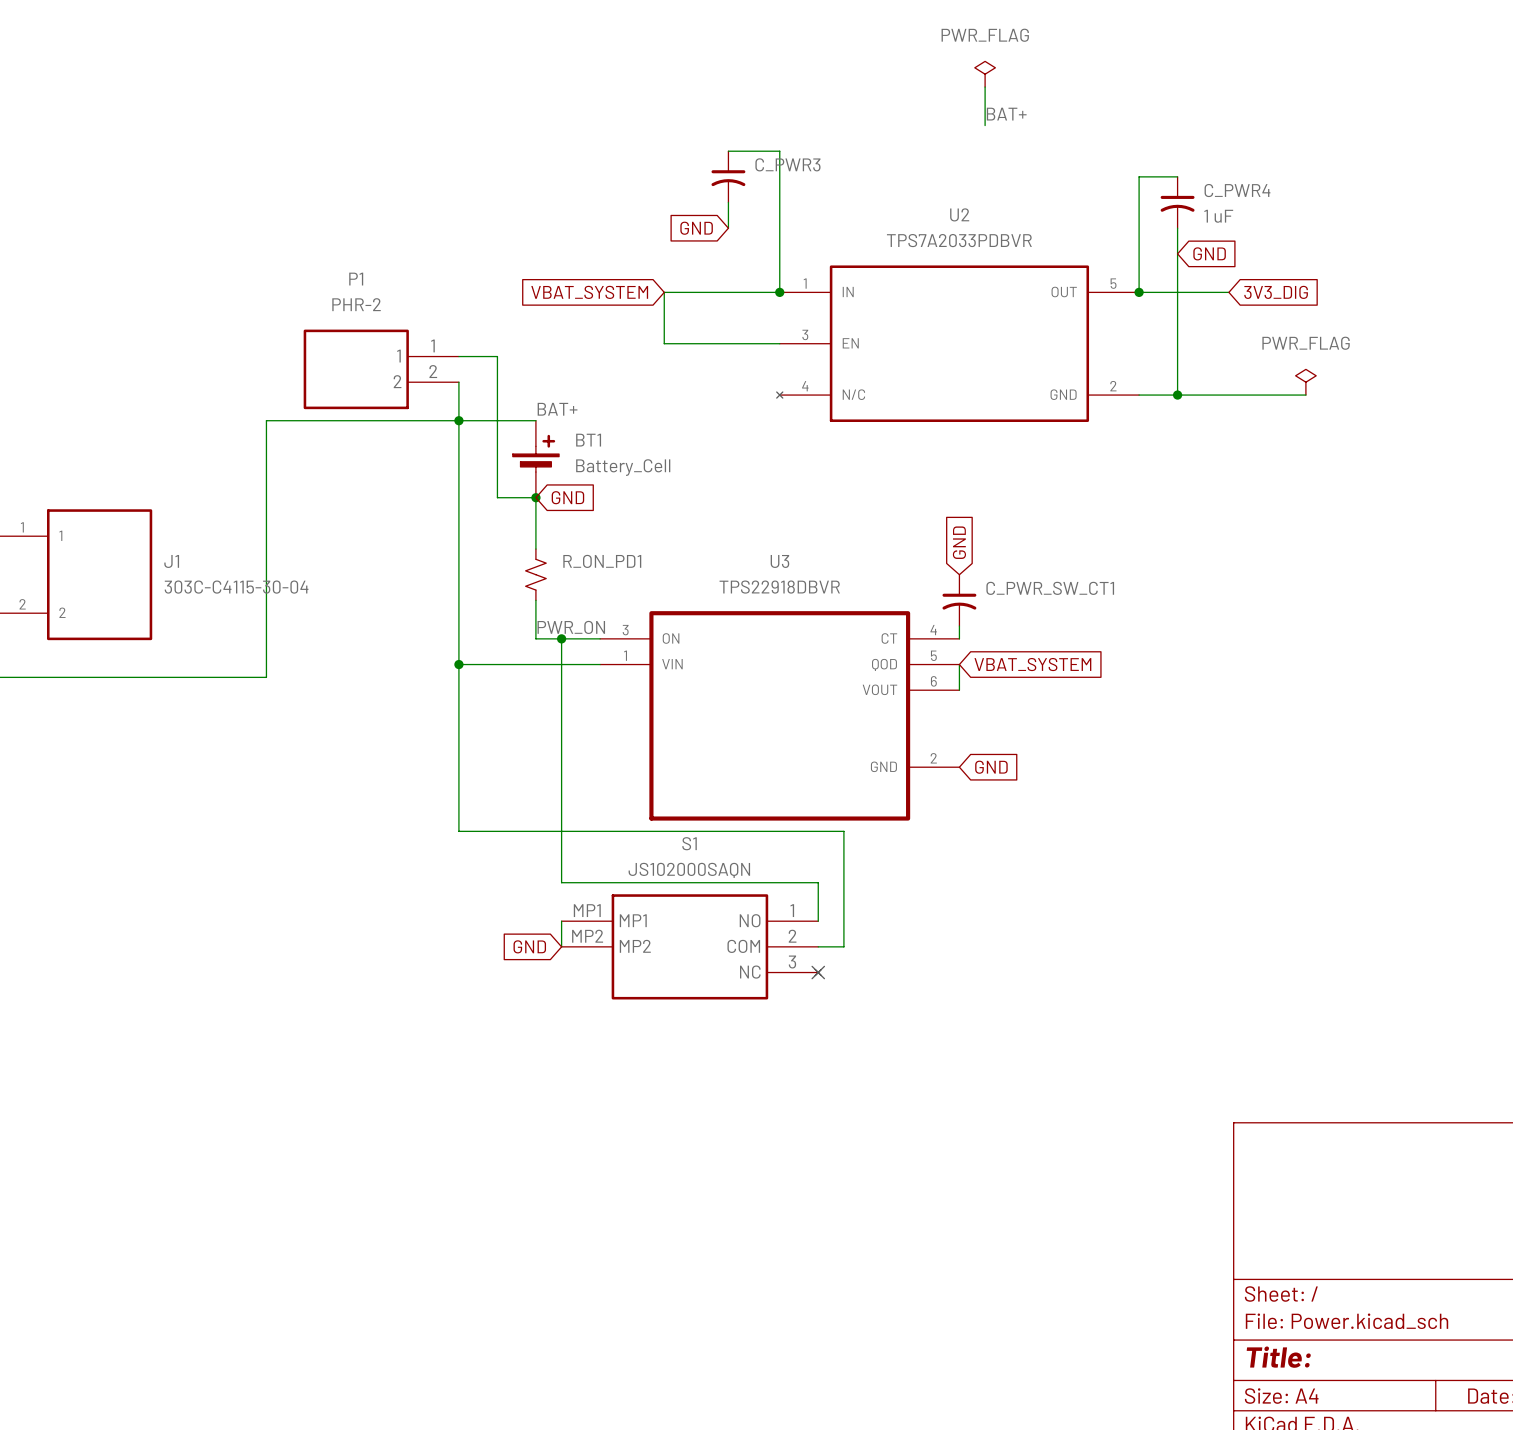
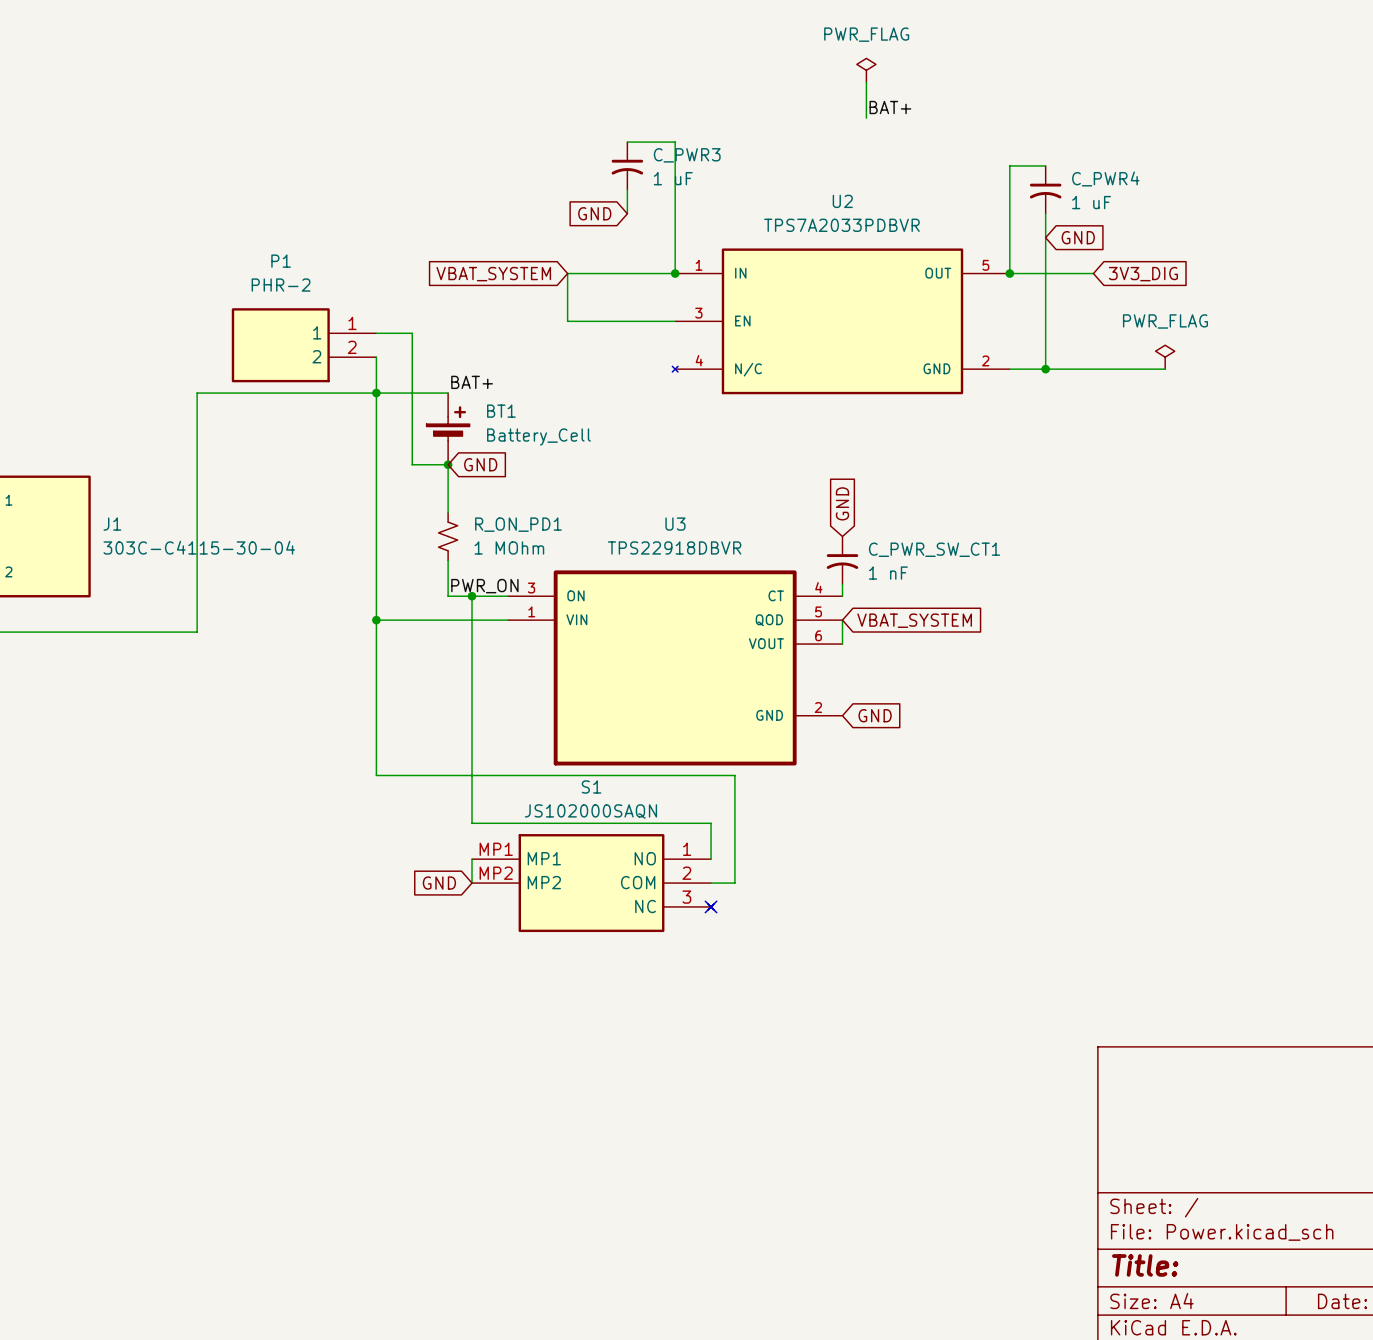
C_PWR3 value: none -> 1 uF (673, 178)
R_ON_PD1 value: none -> 1 MOhm (509, 547)
C_PWR_SW_CT1 value: none -> 1 nF (888, 573)

